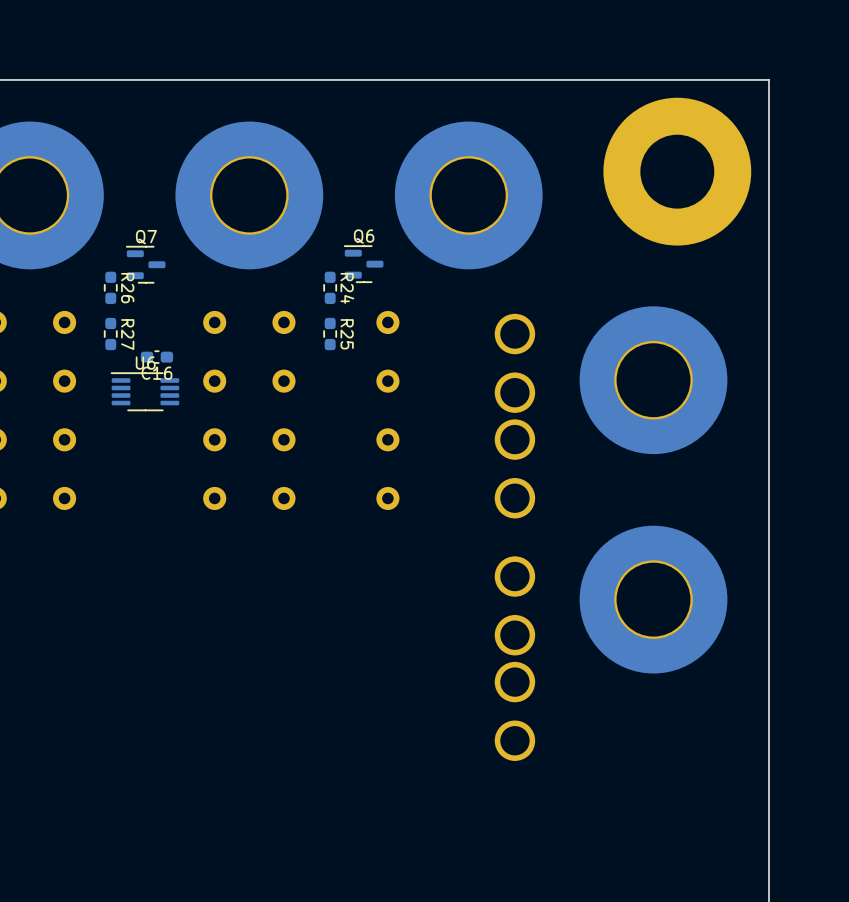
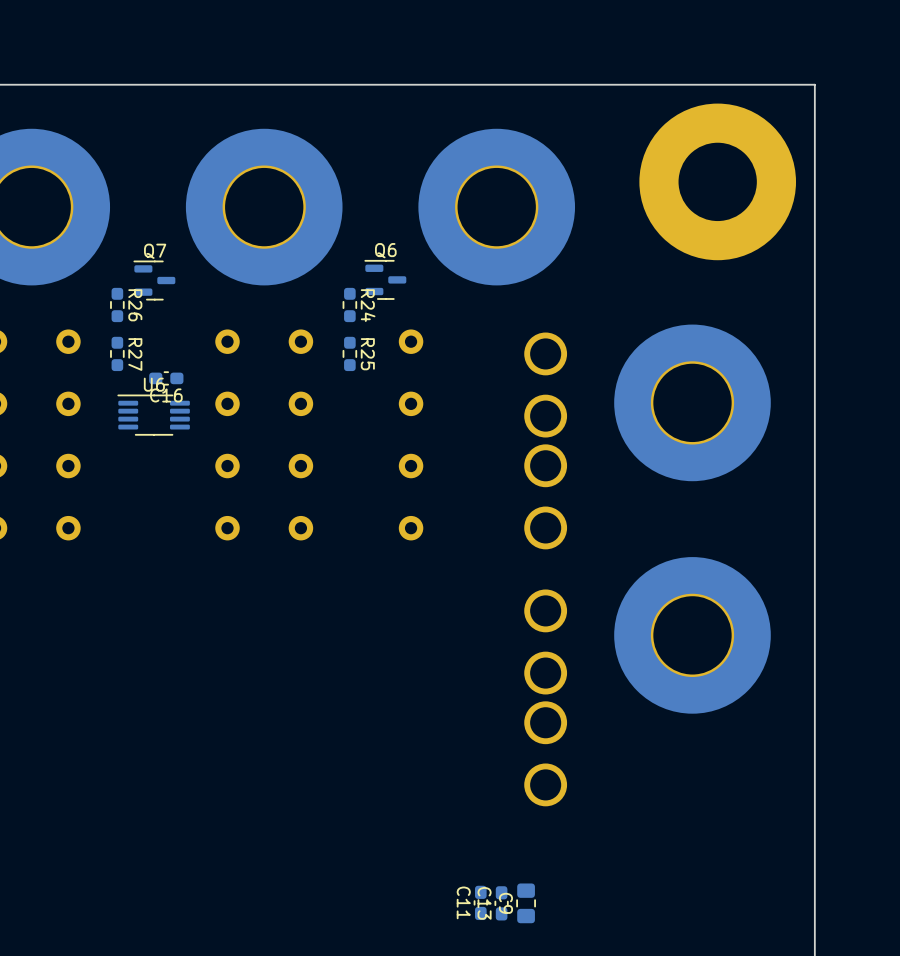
C11: none -> (480, 902)
C13: none -> (501, 903)
C9: none -> (526, 903)

